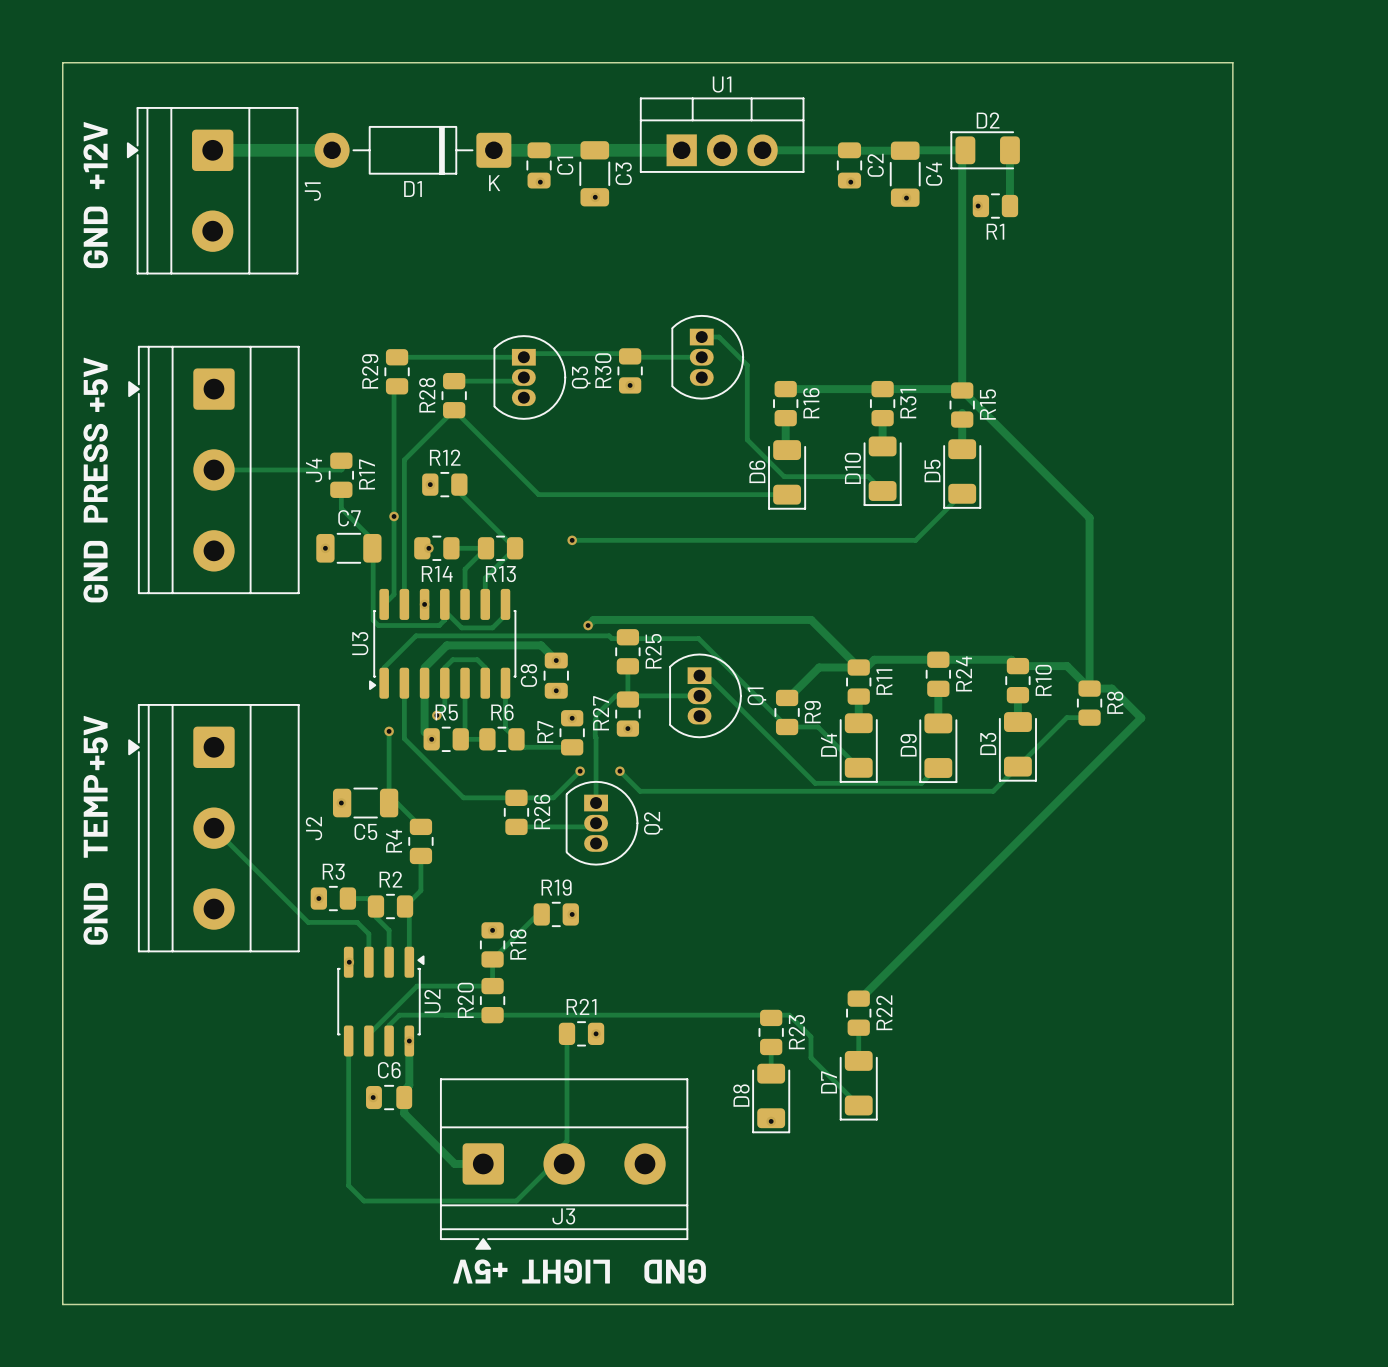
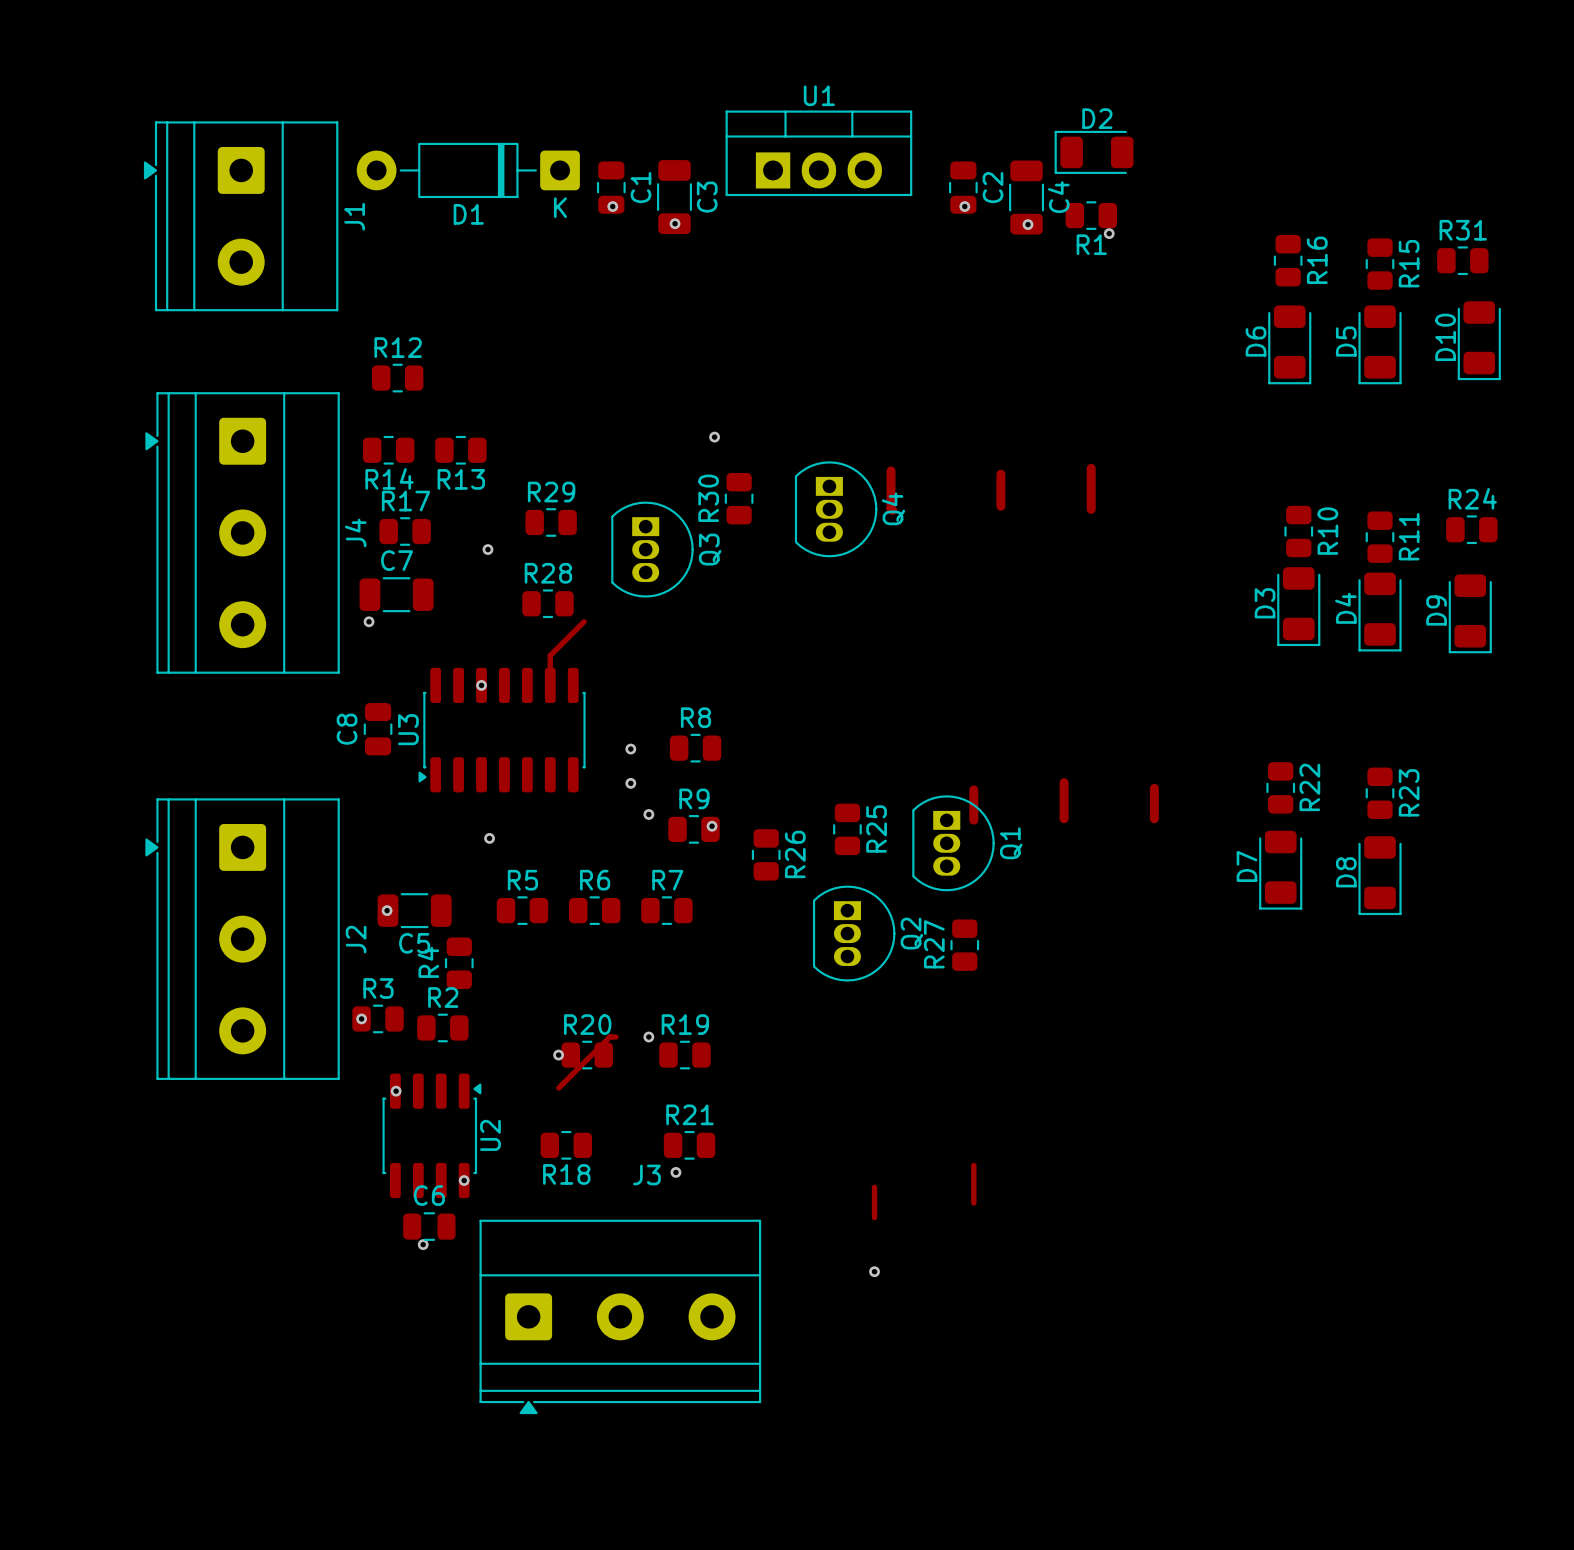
board edge: (62, 62) (1232, 62) (1232, 1304) (62, 1304) (62, 62) -> none
track: (212, 150) (332, 150) -> none
track: (493, 150) (681, 150) -> none
track: (762, 150) (965, 150) (962, 153) (962, 390) -> none
D2 position: (985, 150) -> (1094, 152)
track: (1009, 150) (1009, 206) -> none
text: +12V (95, 155) -> none
R1 position: (995, 206) -> (1091, 215)
text: GND (95, 237) -> none
track: (701, 337) (719, 337) (747, 365) (747, 439) (784, 476) (868, 476) (882, 490) -> none
track: (397, 357) (523, 357) (527, 353) (632, 353) (636, 357) (701, 357) -> none
part: (707, 357) -> none
R30 position: (630, 370) -> (739, 498)
R29 rotation: 0° (397, 371) -> 90° clockwise (551, 522)
R29 position: (397, 371) -> (551, 522)
track: (523, 377) (516, 377) (512, 381) (454, 381) -> none
Q3 position: (529, 377) -> (652, 549)
text: +5V (95, 384) -> none
track: (397, 386) (394, 389) (394, 594) (384, 604) -> none
track: (785, 389) (960, 389) (1089, 517) (1089, 688) -> none
R28 rotation: 0° (454, 395) -> 90° clockwise (547, 603)
R28 position: (454, 395) -> (547, 603)
R16 position: (785, 403) -> (1288, 260)
R31 rotation: 0° (882, 403) -> 90° clockwise (1462, 260)
R31 position: (882, 403) -> (1462, 260)
R31 name position: R31 (908, 403) -> R31 (1463, 230)
R15 position: (962, 405) -> (1380, 264)
Q4: none -> (836, 509)
track: (342, 468) (213, 469) -> none
D10 position: (882, 471) -> (1479, 340)
text: PRESS (95, 473) -> none
R17 name position: R17 (367, 474) -> R17 (406, 501)
D6 position: (787, 474) -> (1289, 344)
D5 position: (962, 474) -> (1380, 344)
R17 rotation: 0° (341, 475) -> 90° clockwise (405, 531)
R12 position: (444, 484) -> (397, 378)
track: (459, 484) (459, 492) (515, 548) (515, 540) -> none
track: (341, 489) (341, 508) (372, 539) (373, 620) (378, 625) (439, 625) (444, 619) (444, 604) -> none
track: (962, 493) (915, 540) (572, 540) -> none
track: (787, 494) (538, 494) (454, 410) (404, 459) (404, 604) -> none
via: (394, 516) -> none
via: (572, 540) -> none
C7 position: (348, 548) -> (396, 594)
via: (428, 548) -> none
R14 position: (436, 548) -> (388, 450)
track: (451, 548) (486, 548) (465, 569) (465, 604) -> none
R13 position: (500, 548) -> (460, 450)
text: GND (95, 571) -> none
track: (505, 604) (505, 615) (492, 627) (461, 627) (444, 611) -> none
track: (588, 625) (593, 619) (811, 619) (858, 667) -> none
via: (588, 625) -> none
R25 position: (627, 651) -> (847, 829)
track: (556, 660) (541, 645) (446, 645) (424, 667) (424, 732) (431, 739) -> none
track: (627, 666) (627, 699) -> none
R24 name position: R24 (963, 673) -> R24 (1472, 498)
R24 rotation: 0° (938, 674) -> 90° clockwise (1471, 529)
R24 position: (938, 674) -> (1471, 529)
C8 position: (556, 675) -> (378, 729)
track: (699, 675) (707, 675) (815, 783) (921, 783) (938, 766) -> none
R10 position: (1017, 680) -> (1298, 531)
R11 position: (858, 682) -> (1380, 537)
track: (384, 683) (384, 667) (416, 635) (609, 635) (611, 638) (698, 638) (787, 727) (817, 727) (858, 767) -> none
track: (404, 683) (404, 738) (463, 797) (553, 797) (580, 771) -> none
track: (465, 683) (465, 735) (460, 739) (487, 739) -> none
track: (485, 683) (485, 667) (477, 659) (452, 659) (444, 667) (444, 707) (436, 715) -> none
track: (505, 683) (505, 728) (524, 747) (572, 747) -> none
track: (1089, 688) (1067, 666) (1017, 666) (1011, 659) (874, 659) (866, 667) (819, 667) (787, 697) -> none
track: (1089, 688) (1111, 688) (1141, 718) (862, 997) -> none
track: (699, 695) (615, 695) (596, 715) (596, 803) -> none
Q1 position: (705, 695) -> (953, 843)
R8 name position: R8 (1115, 702) -> R8 (696, 717)
R8 rotation: 0° (1089, 703) -> 90° clockwise (695, 748)
R8 position: (1089, 703) -> (695, 748)
R9 rotation: 0° (787, 712) -> 90° clockwise (693, 829)
R9 position: (787, 712) -> (693, 829)
R9 name position: R9 (812, 712) -> R9 (694, 798)
R27 position: (627, 714) -> (964, 945)
via: (436, 715) -> none
track: (1089, 717) (1066, 717) (993, 791) (640, 791) (619, 771) -> none
track: (389, 731) (389, 803) (397, 803) (420, 826) -> none
via: (389, 731) -> none
R7 rotation: 0° (572, 732) -> 90° clockwise (666, 910)
R7 position: (572, 732) -> (666, 910)
R5 position: (446, 739) -> (522, 910)
R6 position: (501, 739) -> (594, 910)
text: +5V (95, 743) -> none
D3 position: (1017, 746) -> (1298, 606)
D4 position: (858, 748) -> (1380, 612)
D9 position: (938, 748) -> (1470, 613)
via: (580, 771) -> none
via: (619, 771) -> none
R26 position: (516, 812) -> (766, 854)
text: TEMP (95, 816) -> none
track: (596, 823) (592, 826) (516, 826) -> none
Q2 position: (602, 823) -> (854, 933)
track: (213, 828) (308, 922) (357, 922) (368, 934) (368, 962) -> none
R4 position: (420, 841) -> (459, 963)
track: (420, 855) (420, 890) (405, 906) (409, 910) (409, 962) -> none
track: (347, 898) (368, 898) (375, 906) (375, 917) (389, 930) (389, 962) -> none
text: GND (95, 913) -> none
R19 position: (556, 914) -> (684, 1055)
R18 rotation: 0° (492, 944) -> 90° clockwise (566, 1145)
R18 position: (492, 944) -> (566, 1145)
track: (492, 959) (492, 986) (417, 986) (368, 1034) (368, 1041) -> none
R20 rotation: 0° (492, 1000) -> 90° clockwise (587, 1055)
R20 position: (492, 1000) -> (587, 1055)
R22 position: (858, 1013) -> (1280, 787)
R23 position: (771, 1032) -> (1380, 793)
track: (567, 1033) (567, 1141) (547, 1161) (547, 1170) (516, 1201) (363, 1201) (348, 1185) (348, 1041) -> none
R21 position: (581, 1033) -> (689, 1145)
track: (389, 1041) (389, 1025) (399, 1015) (789, 1015) (810, 1036) (810, 1057) (858, 1105) -> none
track: (409, 1041) (409, 1085) (404, 1090) (404, 1113) (454, 1163) (483, 1163) -> none
D7 position: (858, 1085) -> (1280, 870)
C6 position: (389, 1097) -> (429, 1226)
D8 position: (771, 1098) -> (1380, 875)
J3 position: (564, 1164) -> (620, 1316)
J3 name position: J3 (563, 1216) -> J3 (646, 1174)
text: +5V (480, 1271) -> none
text: LIGHT (566, 1271) -> none
text: GND (675, 1271) -> none

